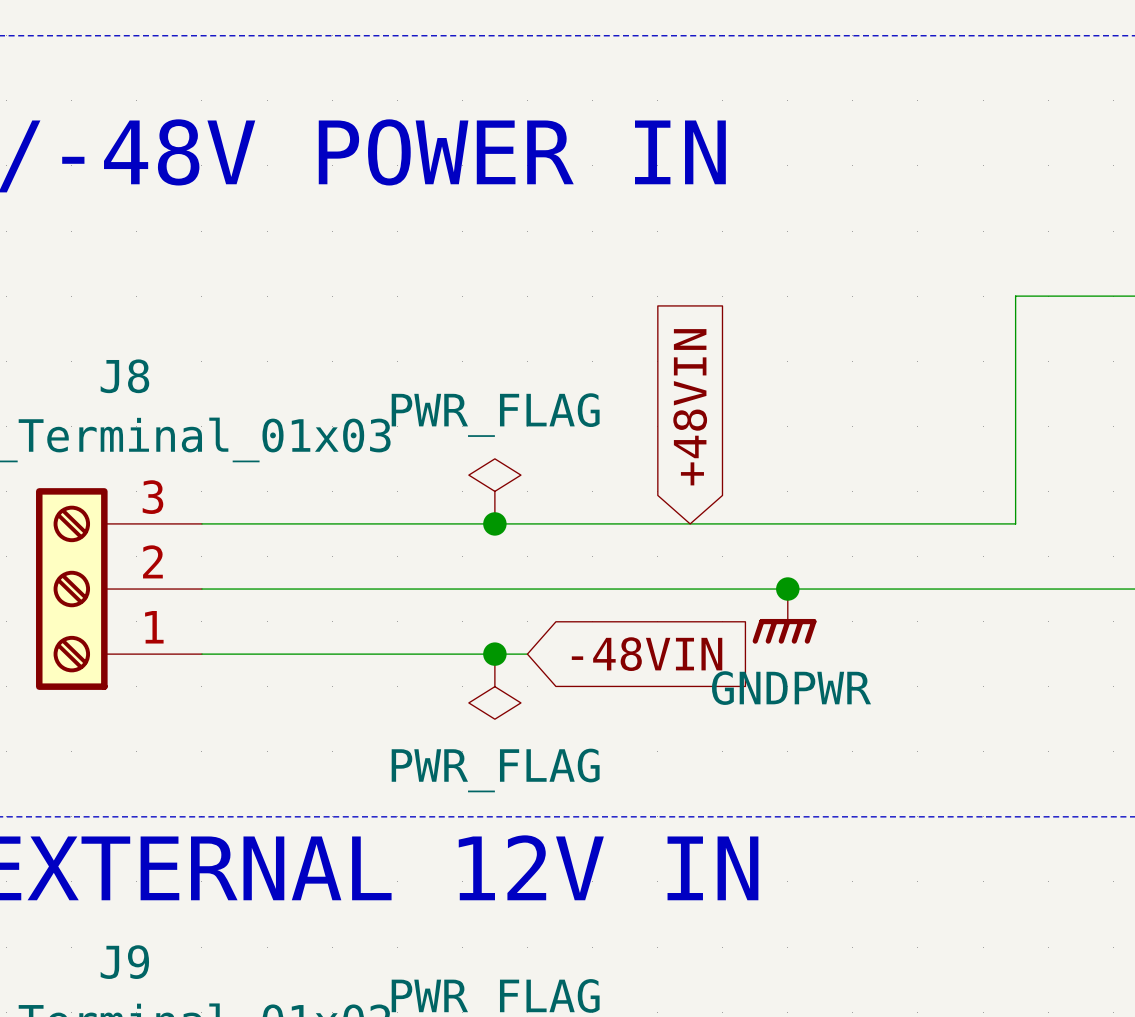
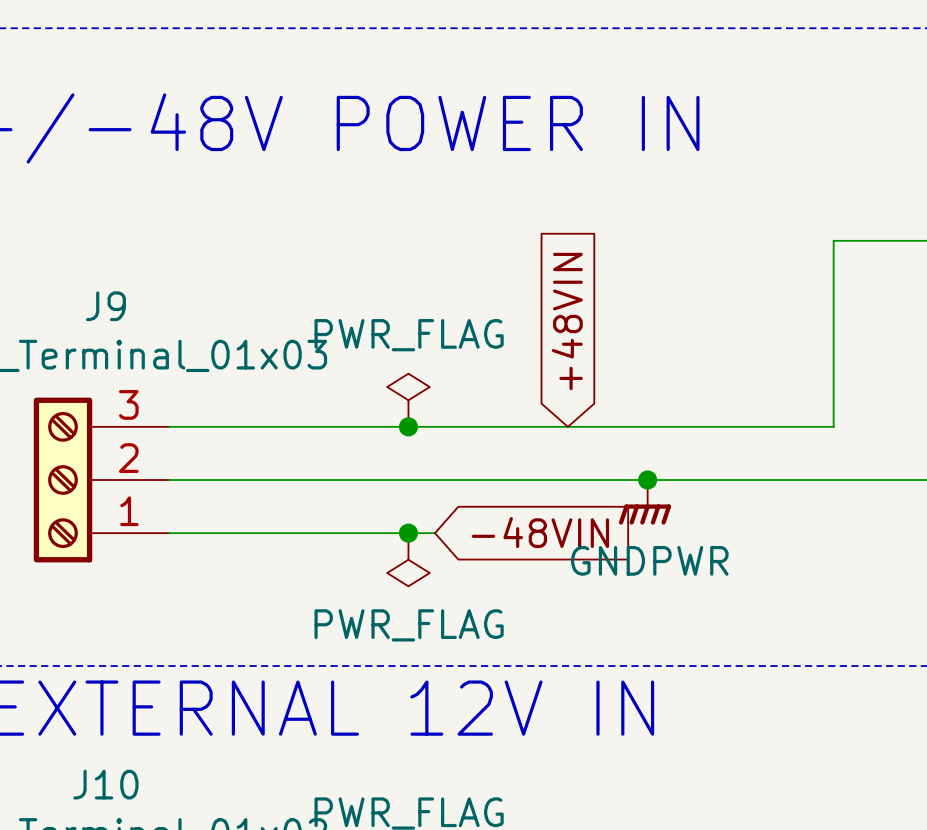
J8 name: J8 (124, 376) -> J9 (105, 306)
J9 name: J9 (124, 962) -> J10 (105, 784)

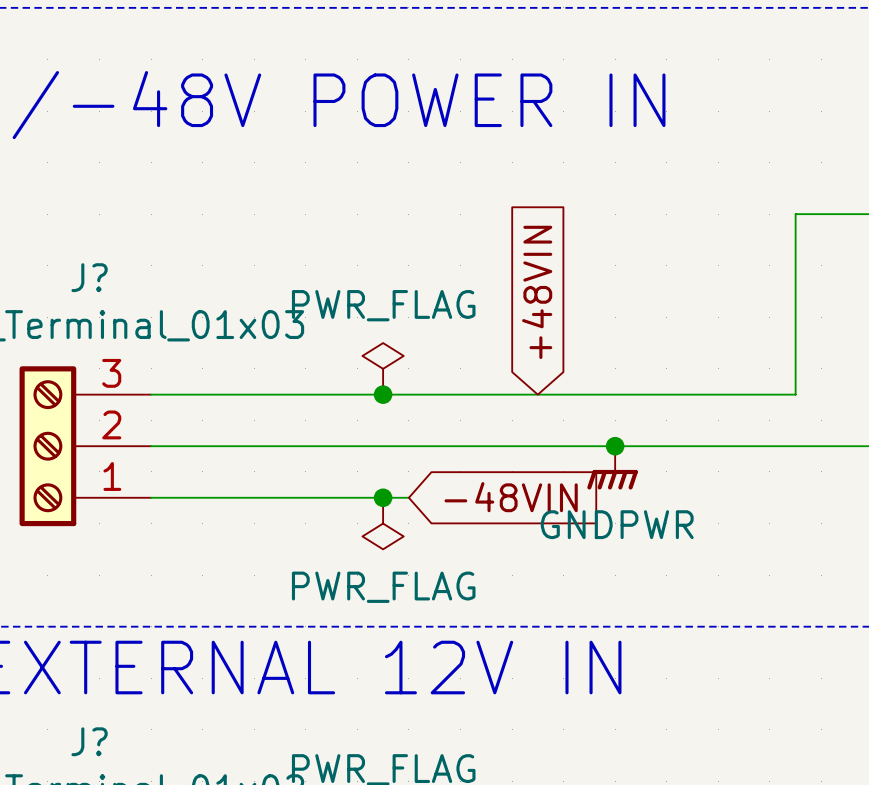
J9 name: J9 (105, 306) -> J? (89, 277)
J10 name: J10 (105, 784) -> J? (89, 741)

